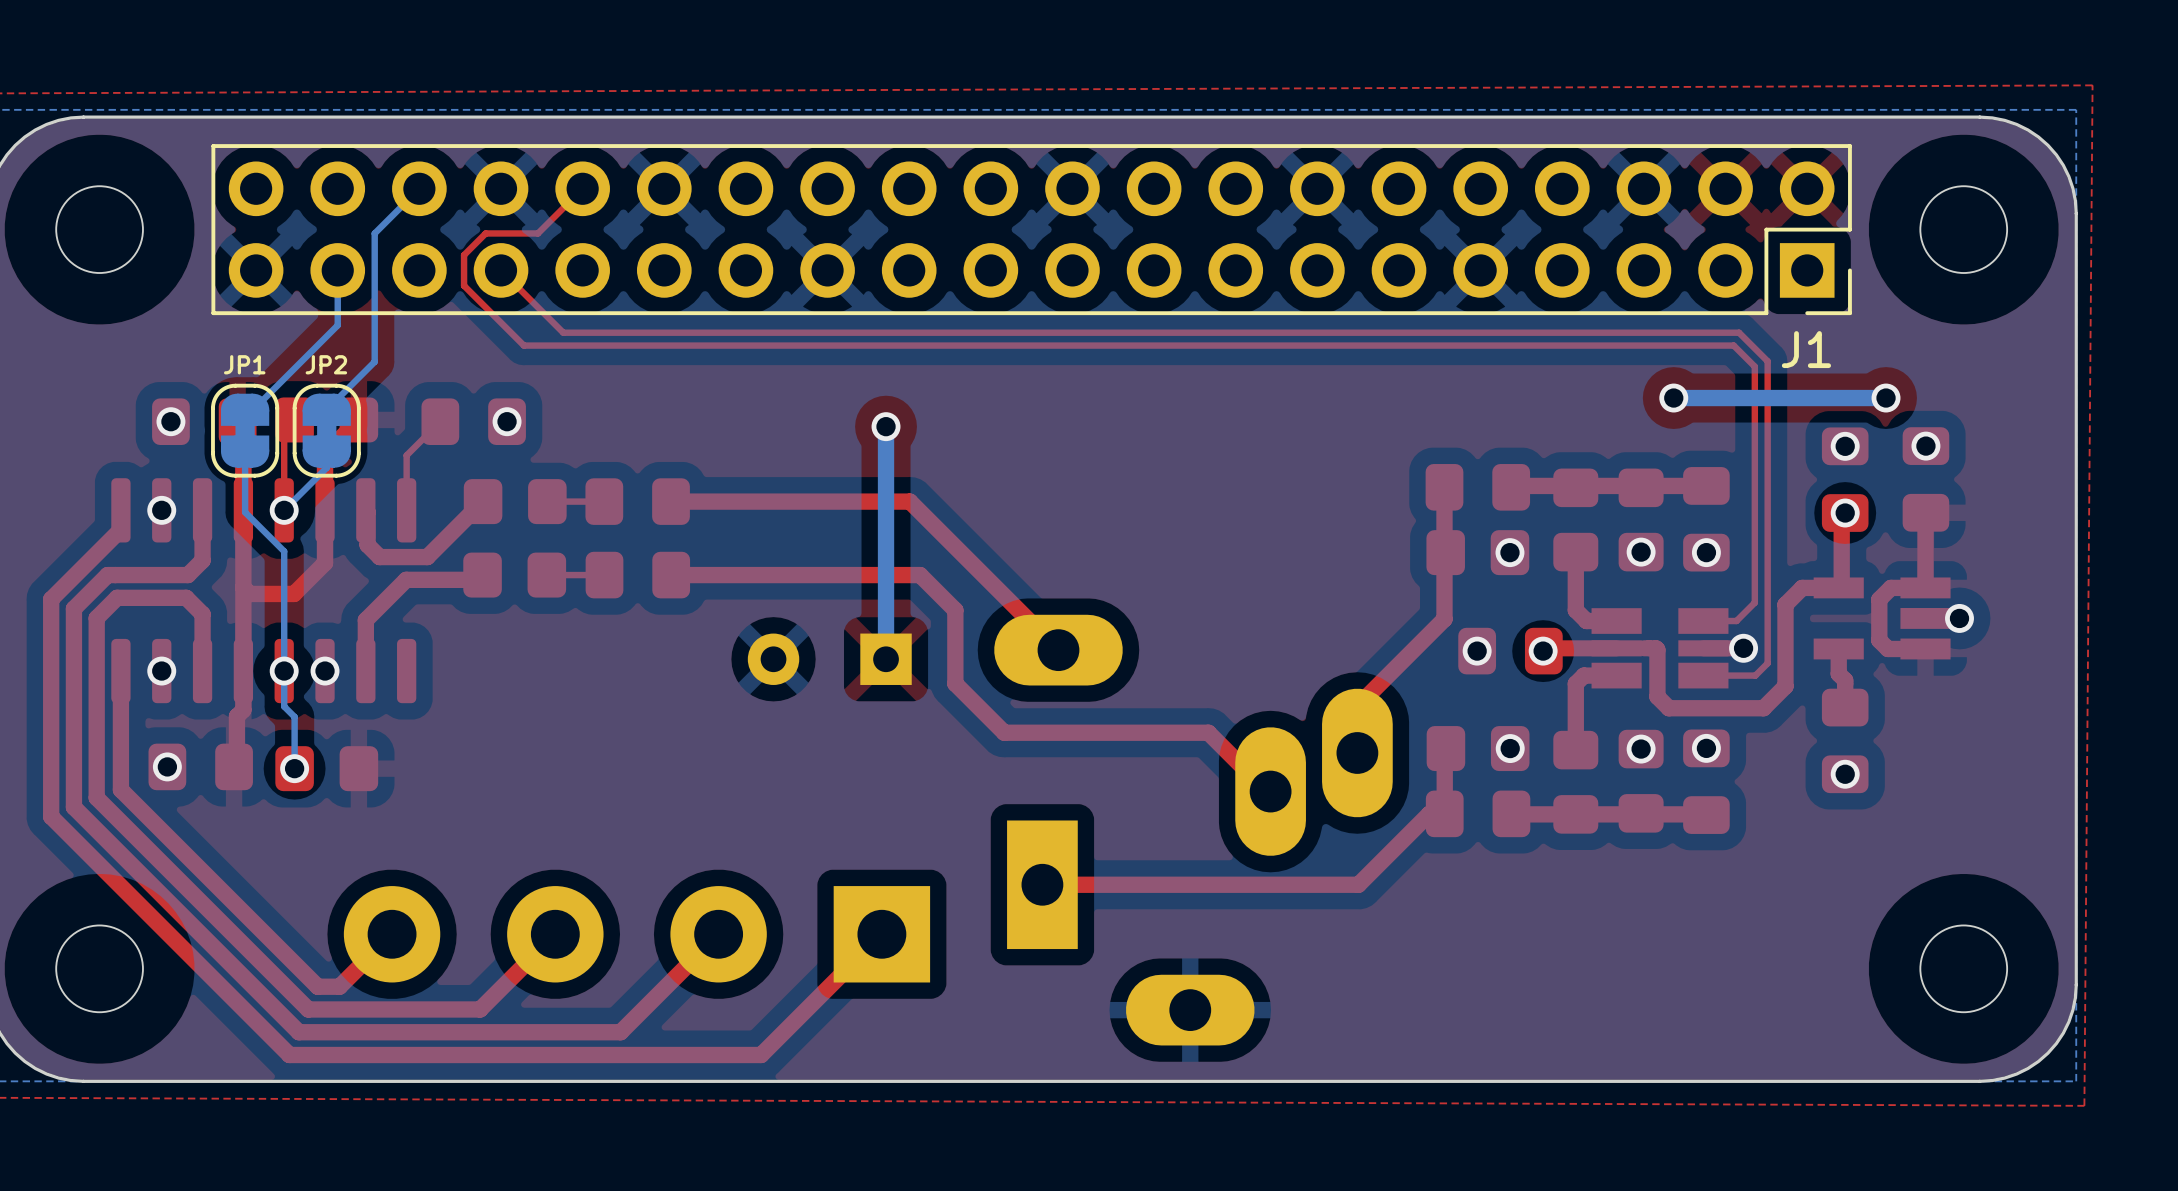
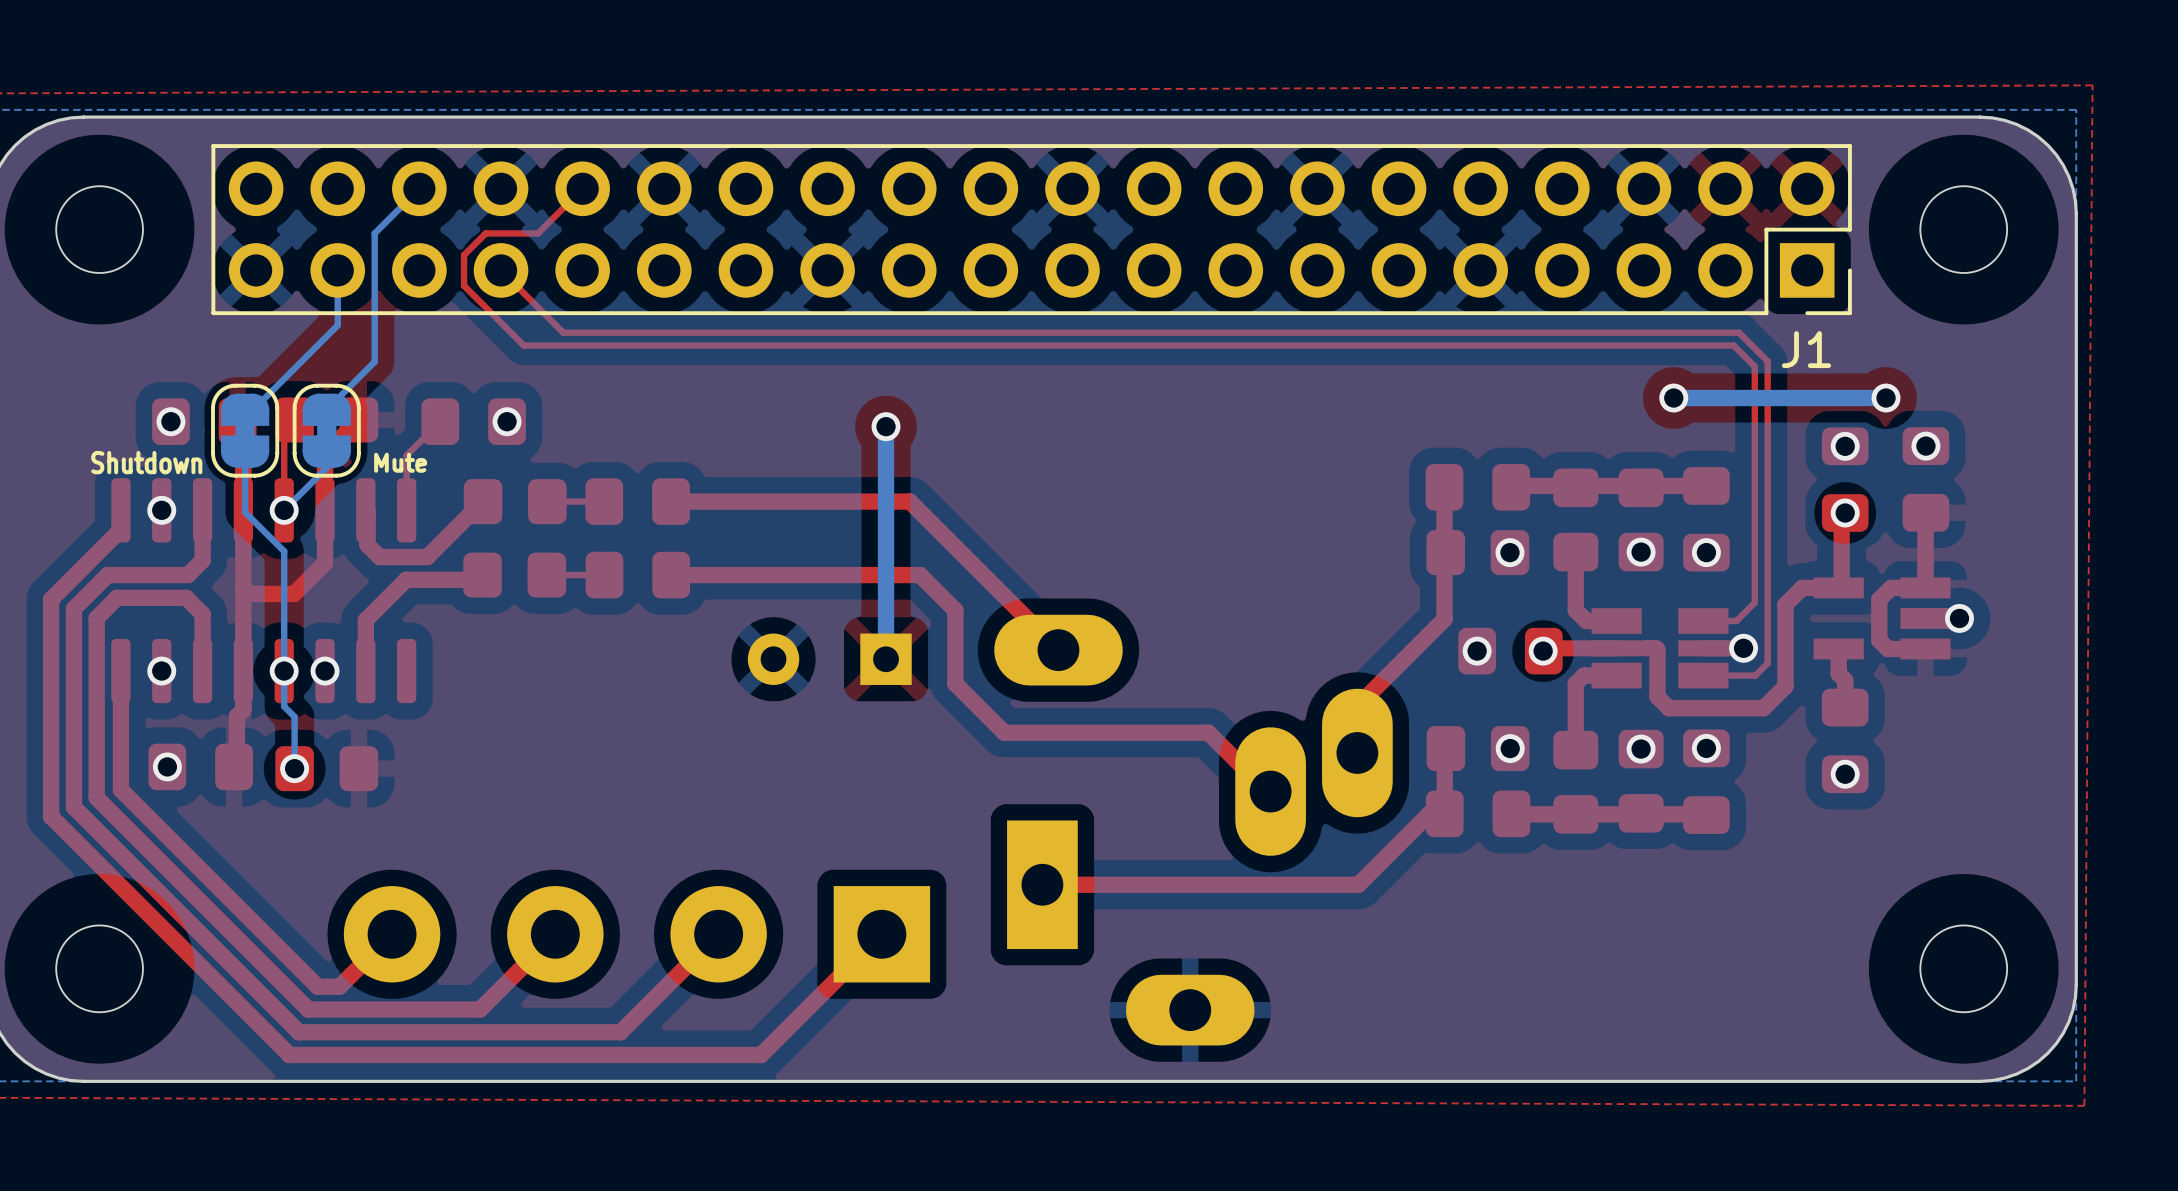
JP1 name: JP1 (244, 364) -> Shutdown (146, 462)
JP2 name: JP2 (326, 364) -> Mute (400, 462)

